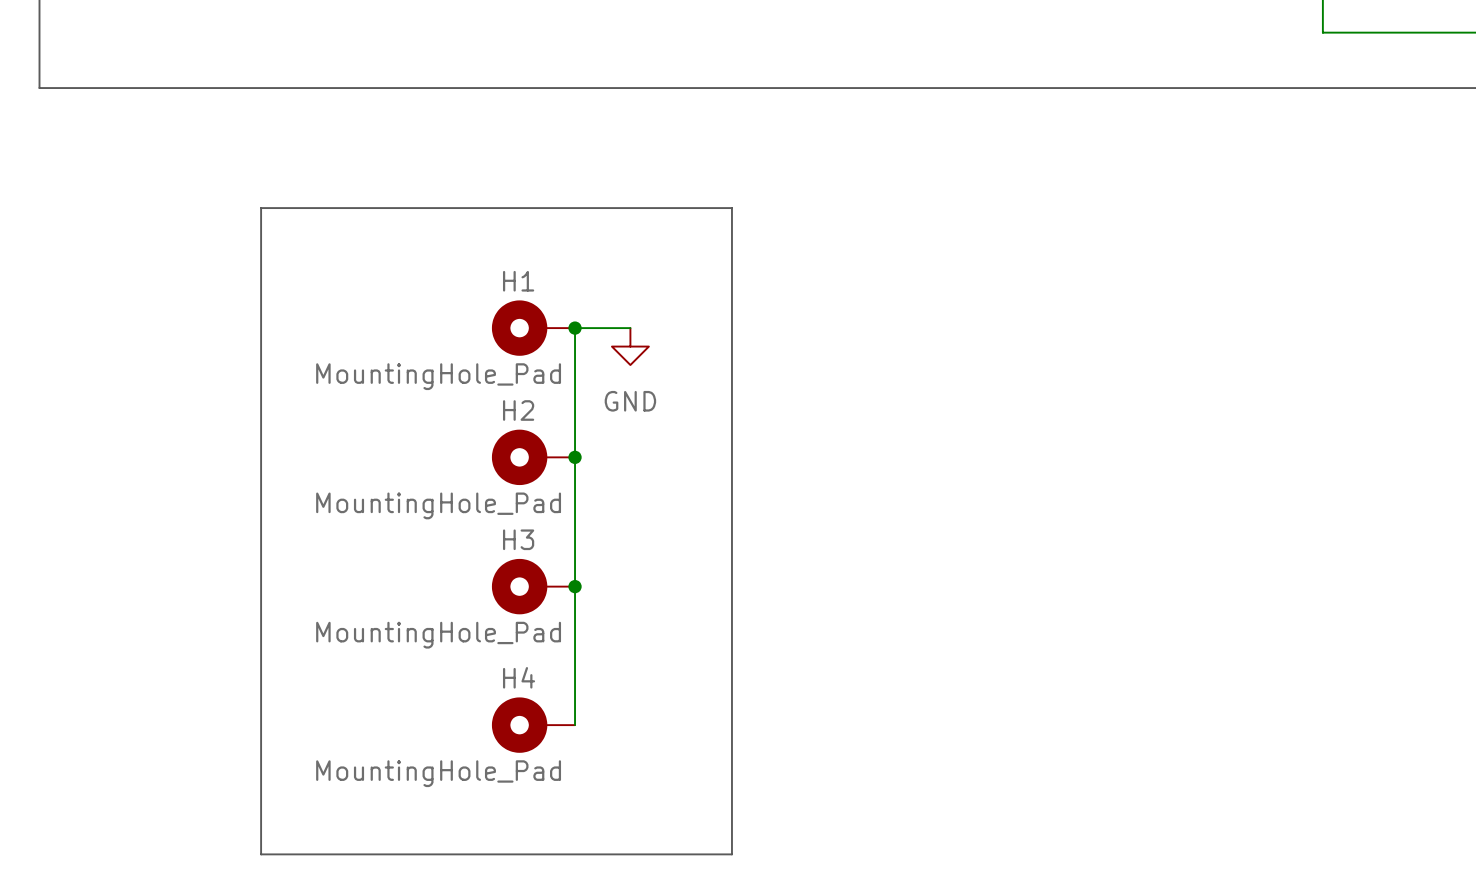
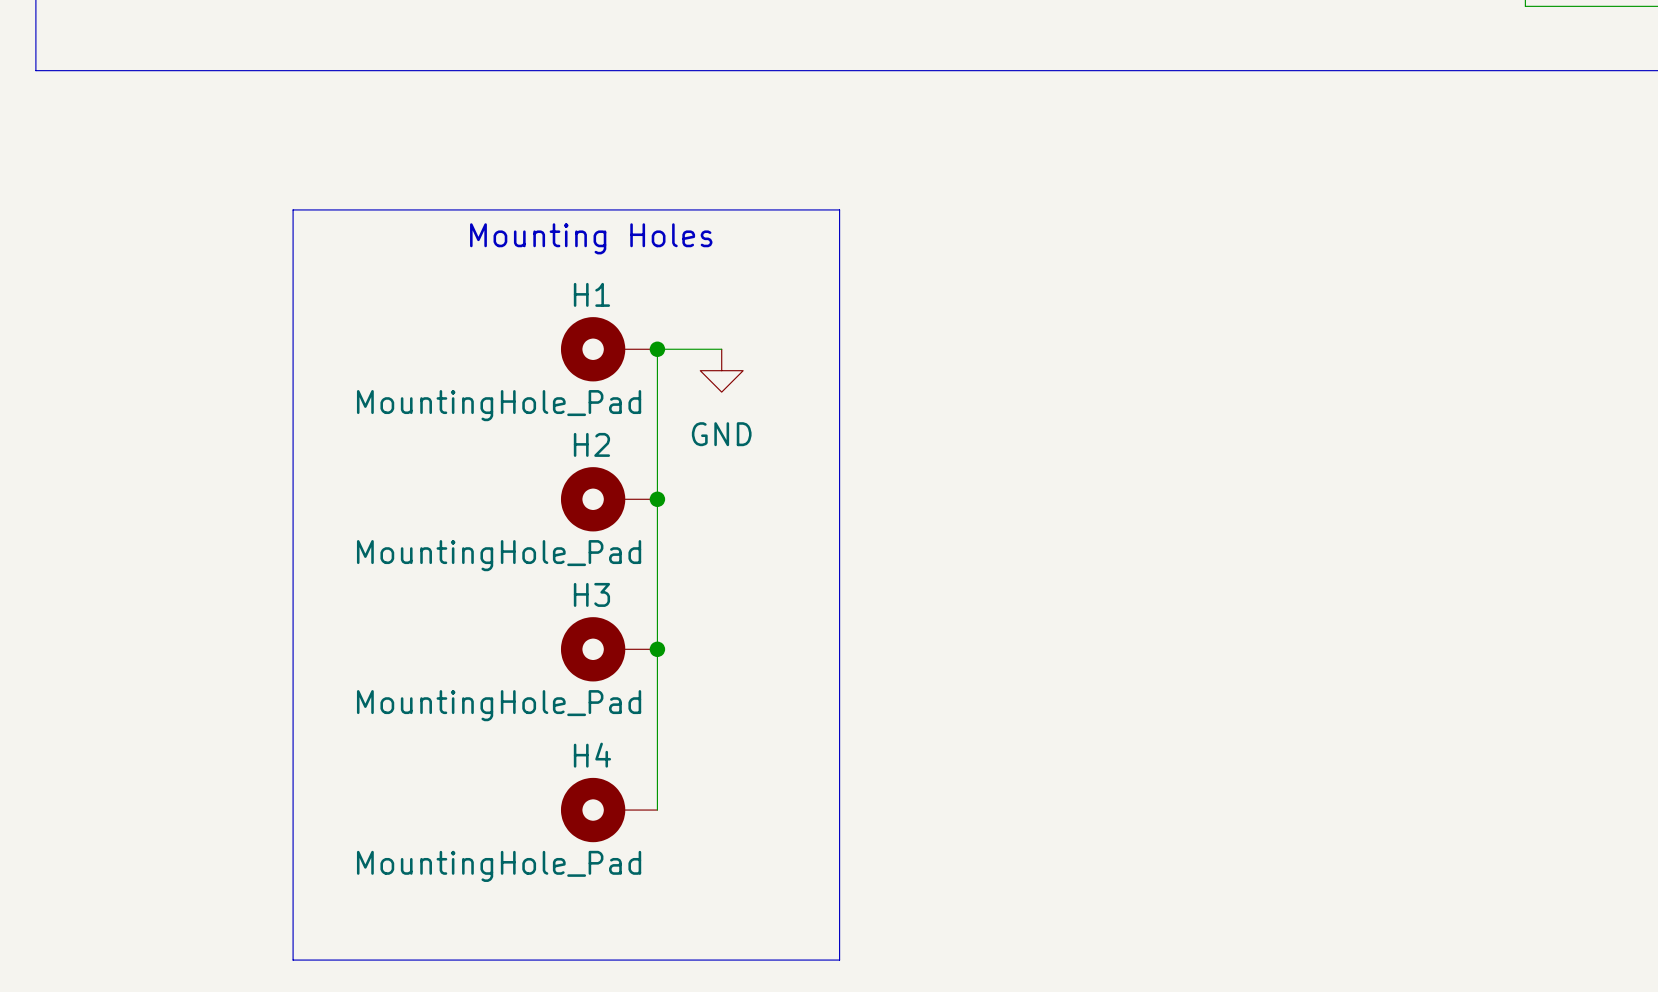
text: none -> Mounting Holes (591, 238)

